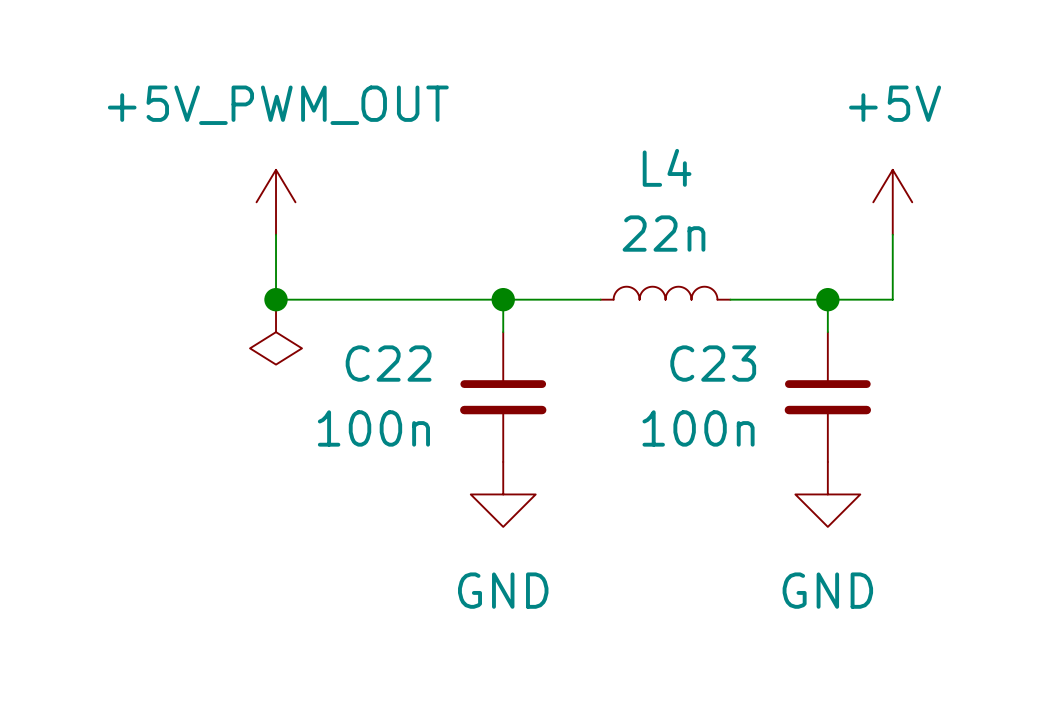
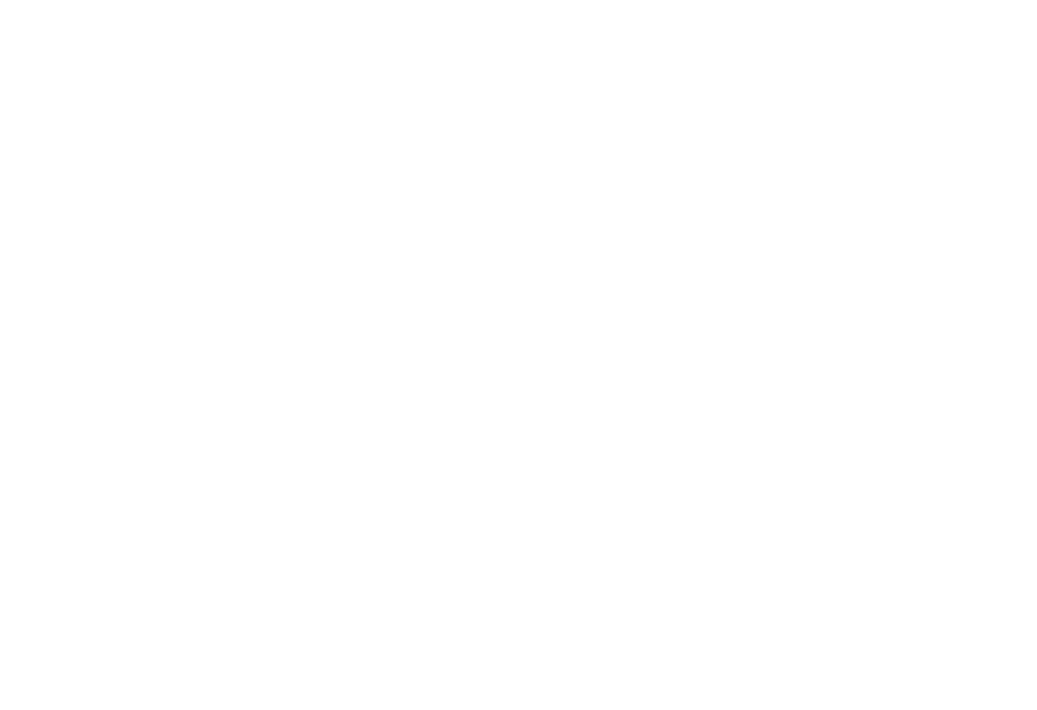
power symbol: +5V_PWM_OUT (276, 202) -> none
power symbol: +5V (892, 202) -> none
wire: (276, 234) (276, 299) (600, 299) -> none
wire: (892, 234) (892, 299) (730, 299) -> none
L4: 22n (665, 293) -> none
junction: (276, 299) -> none
wire: (503, 299) (503, 332) -> none
junction: (503, 299) -> none
wire: (827, 299) (827, 332) -> none
junction: (827, 299) -> none
power symbol: (276, 332) -> none
C22: 100n (503, 397) -> none
C23: 100n (827, 397) -> none
power symbol: GND (503, 494) -> none
power symbol: GND (827, 494) -> none

